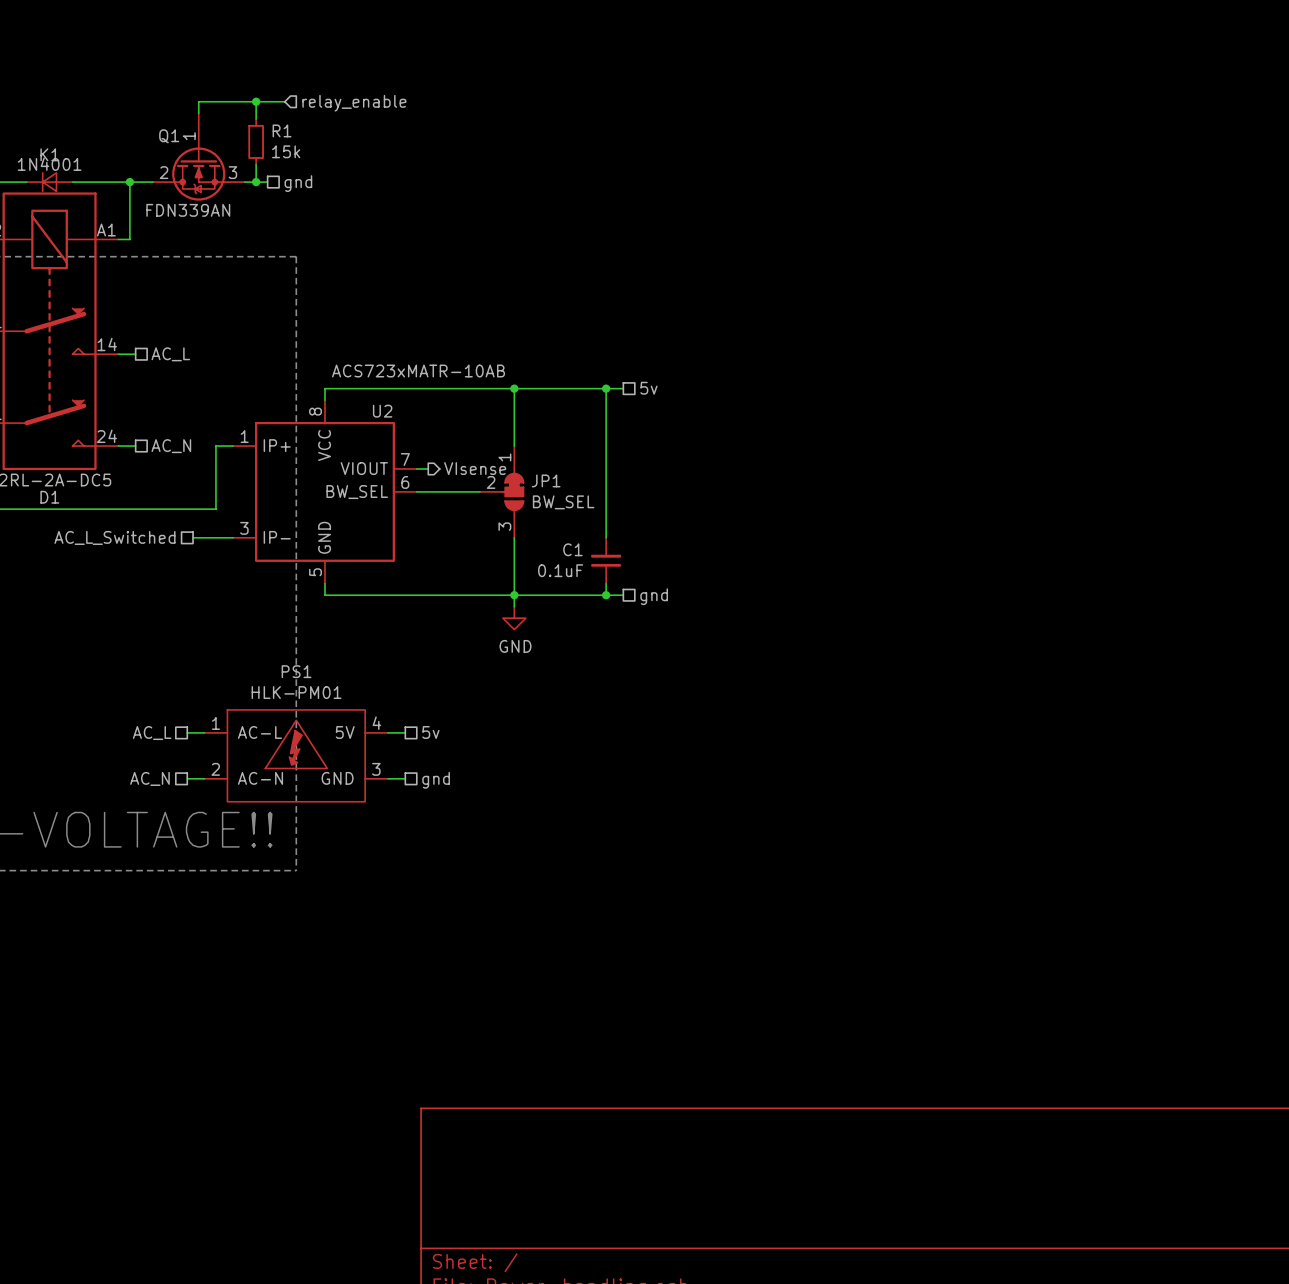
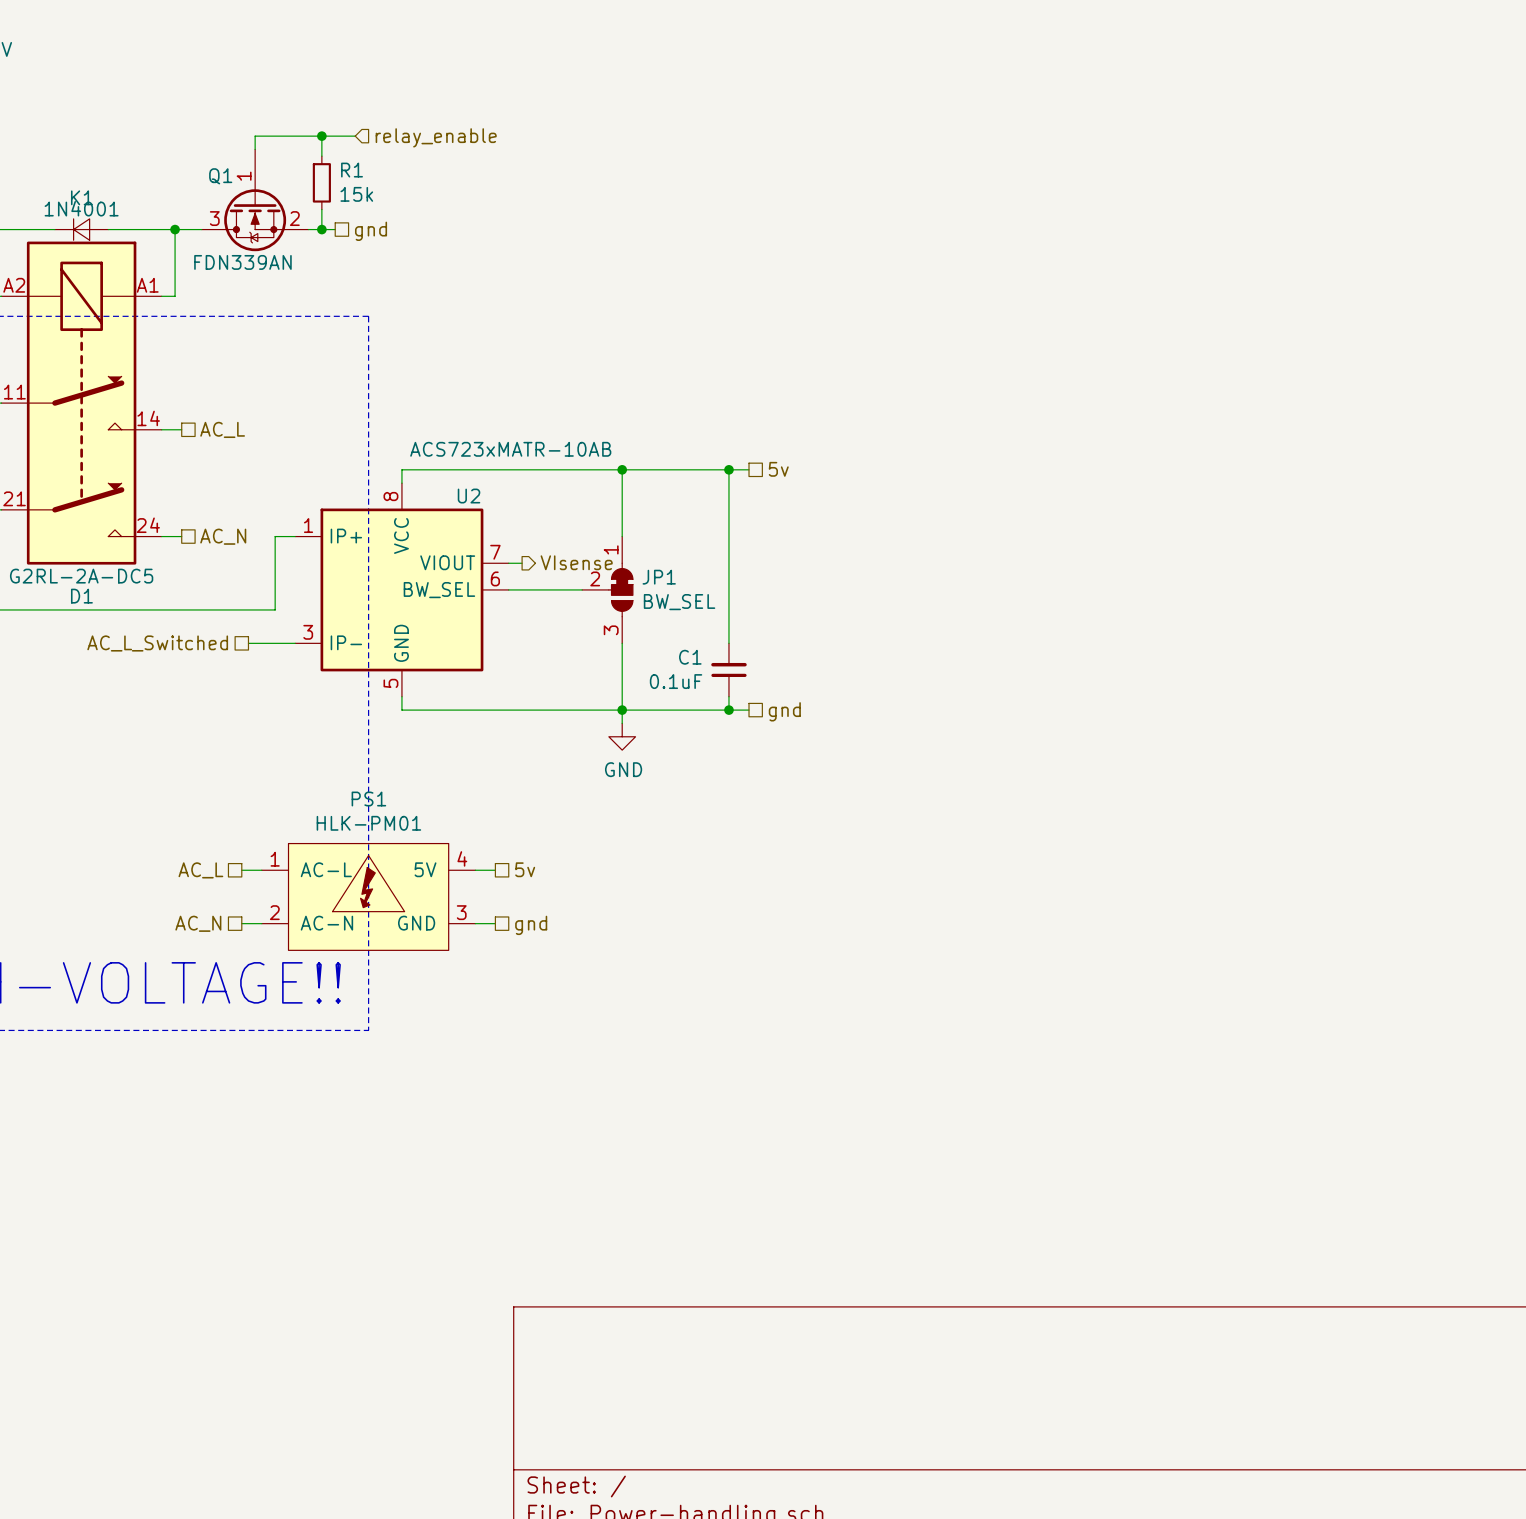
Q1 pin number: 2 (164, 172) -> 3 (214, 218)
Q1 pin number: 3 (232, 172) -> 2 (294, 218)

